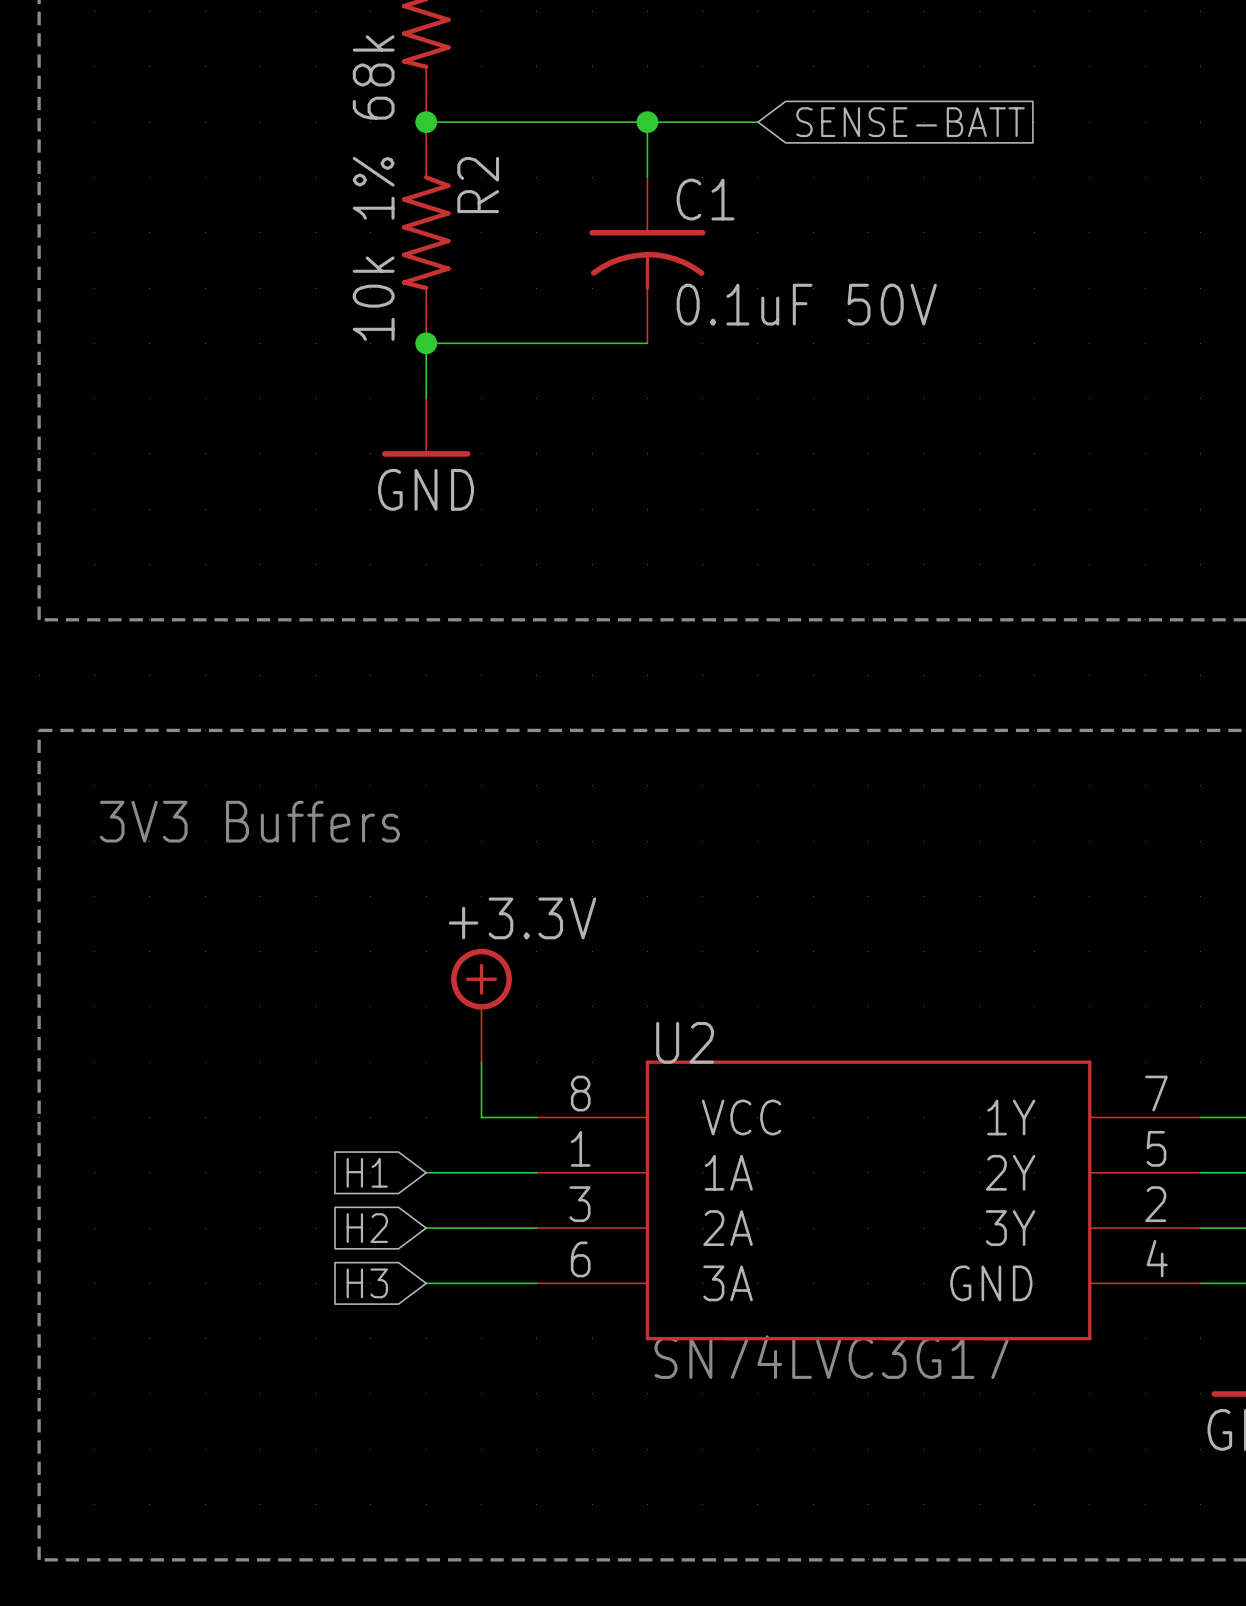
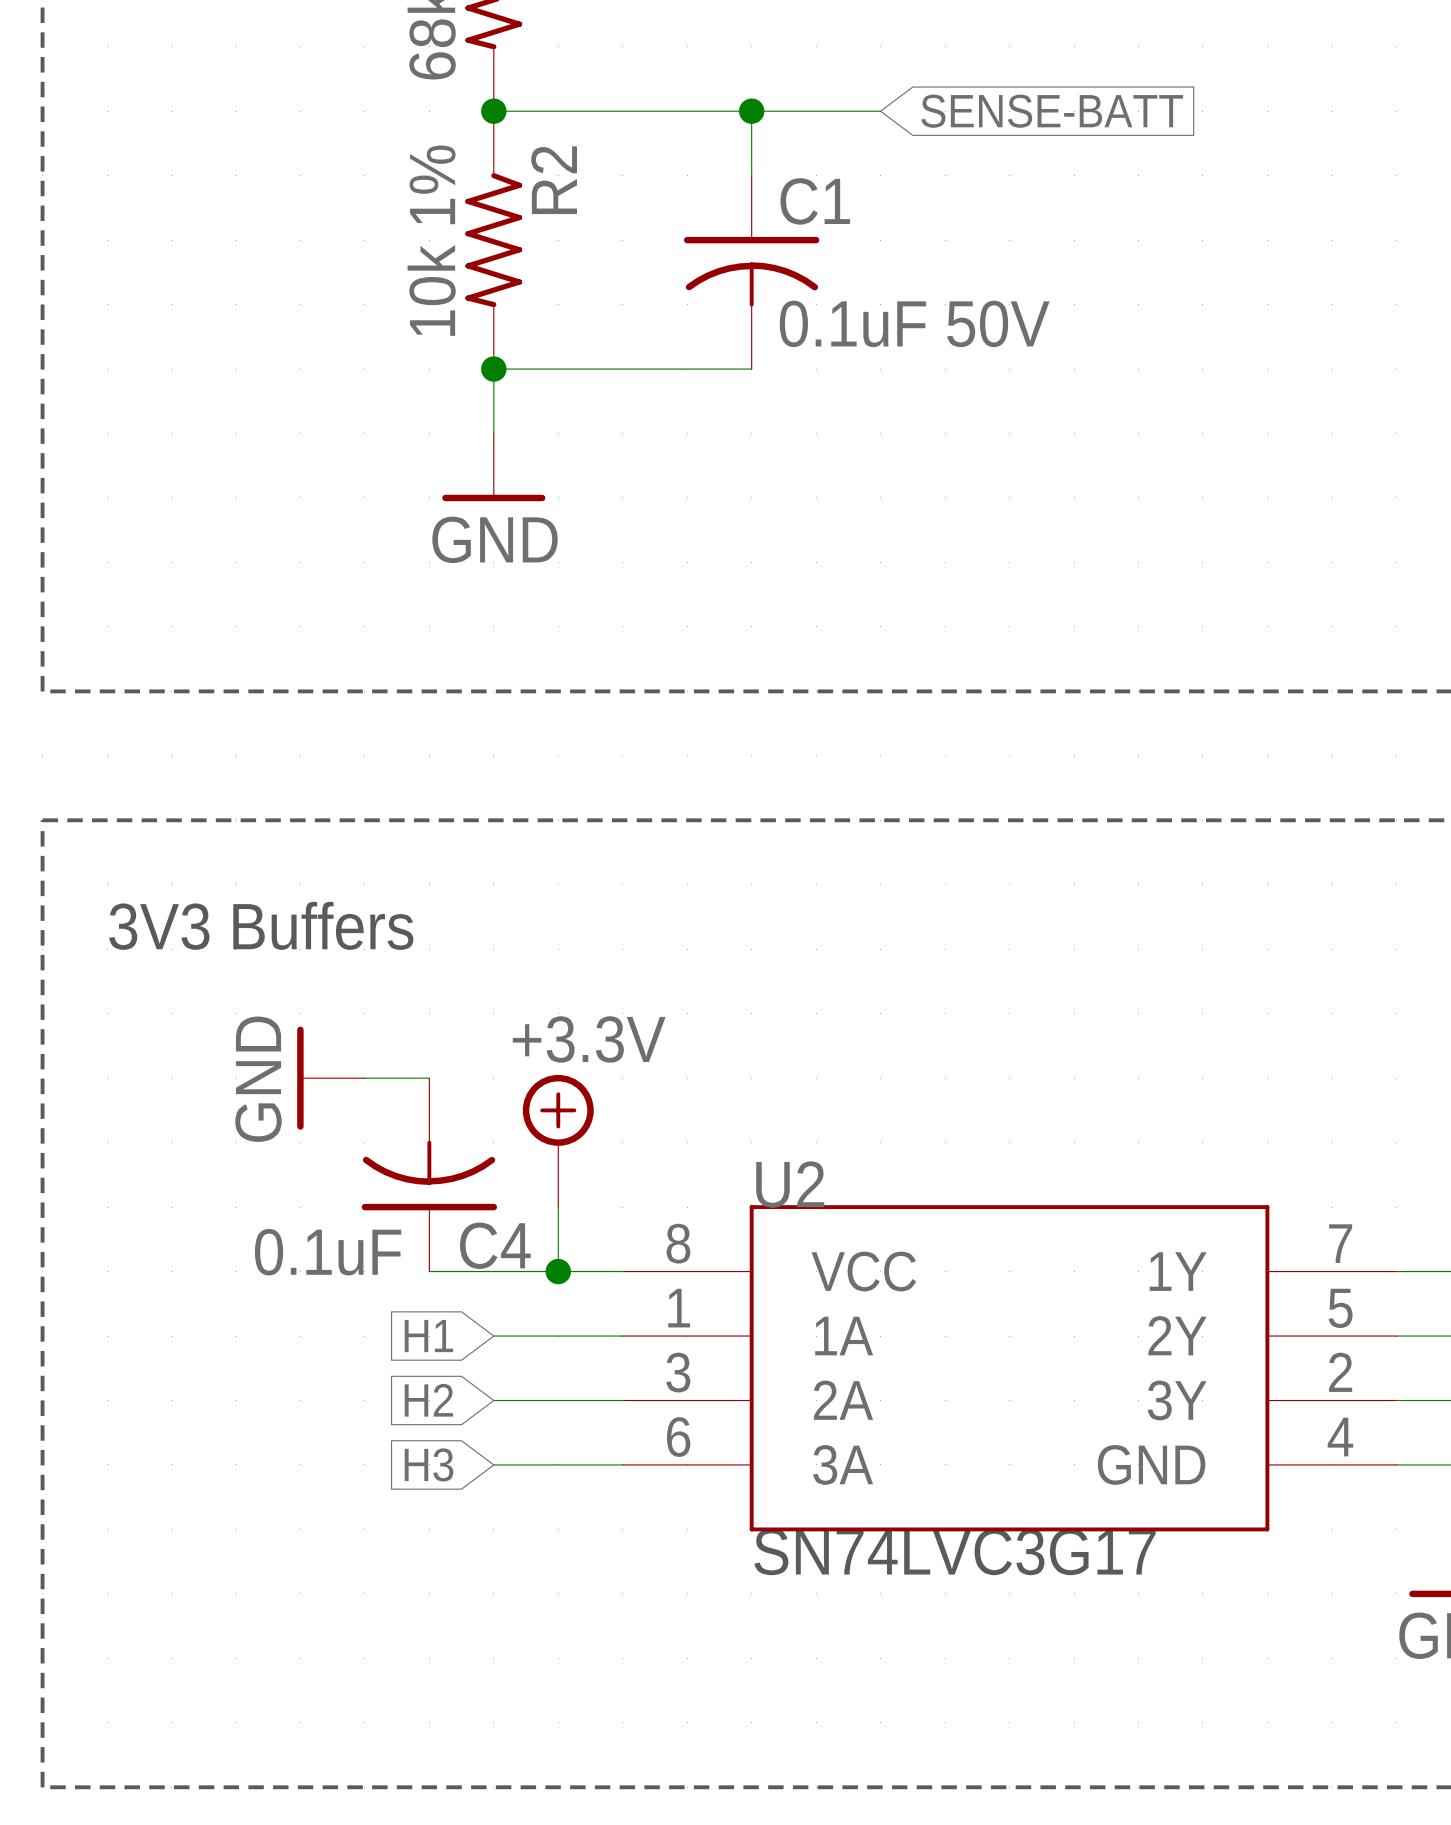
power symbol: none -> GND (331, 1078)
wire: none -> (364, 1078) (429, 1078)
C4: none -> 0.1uF (429, 1174)
wire: none -> (429, 1271) (558, 1271)
junction: none -> (558, 1271)

